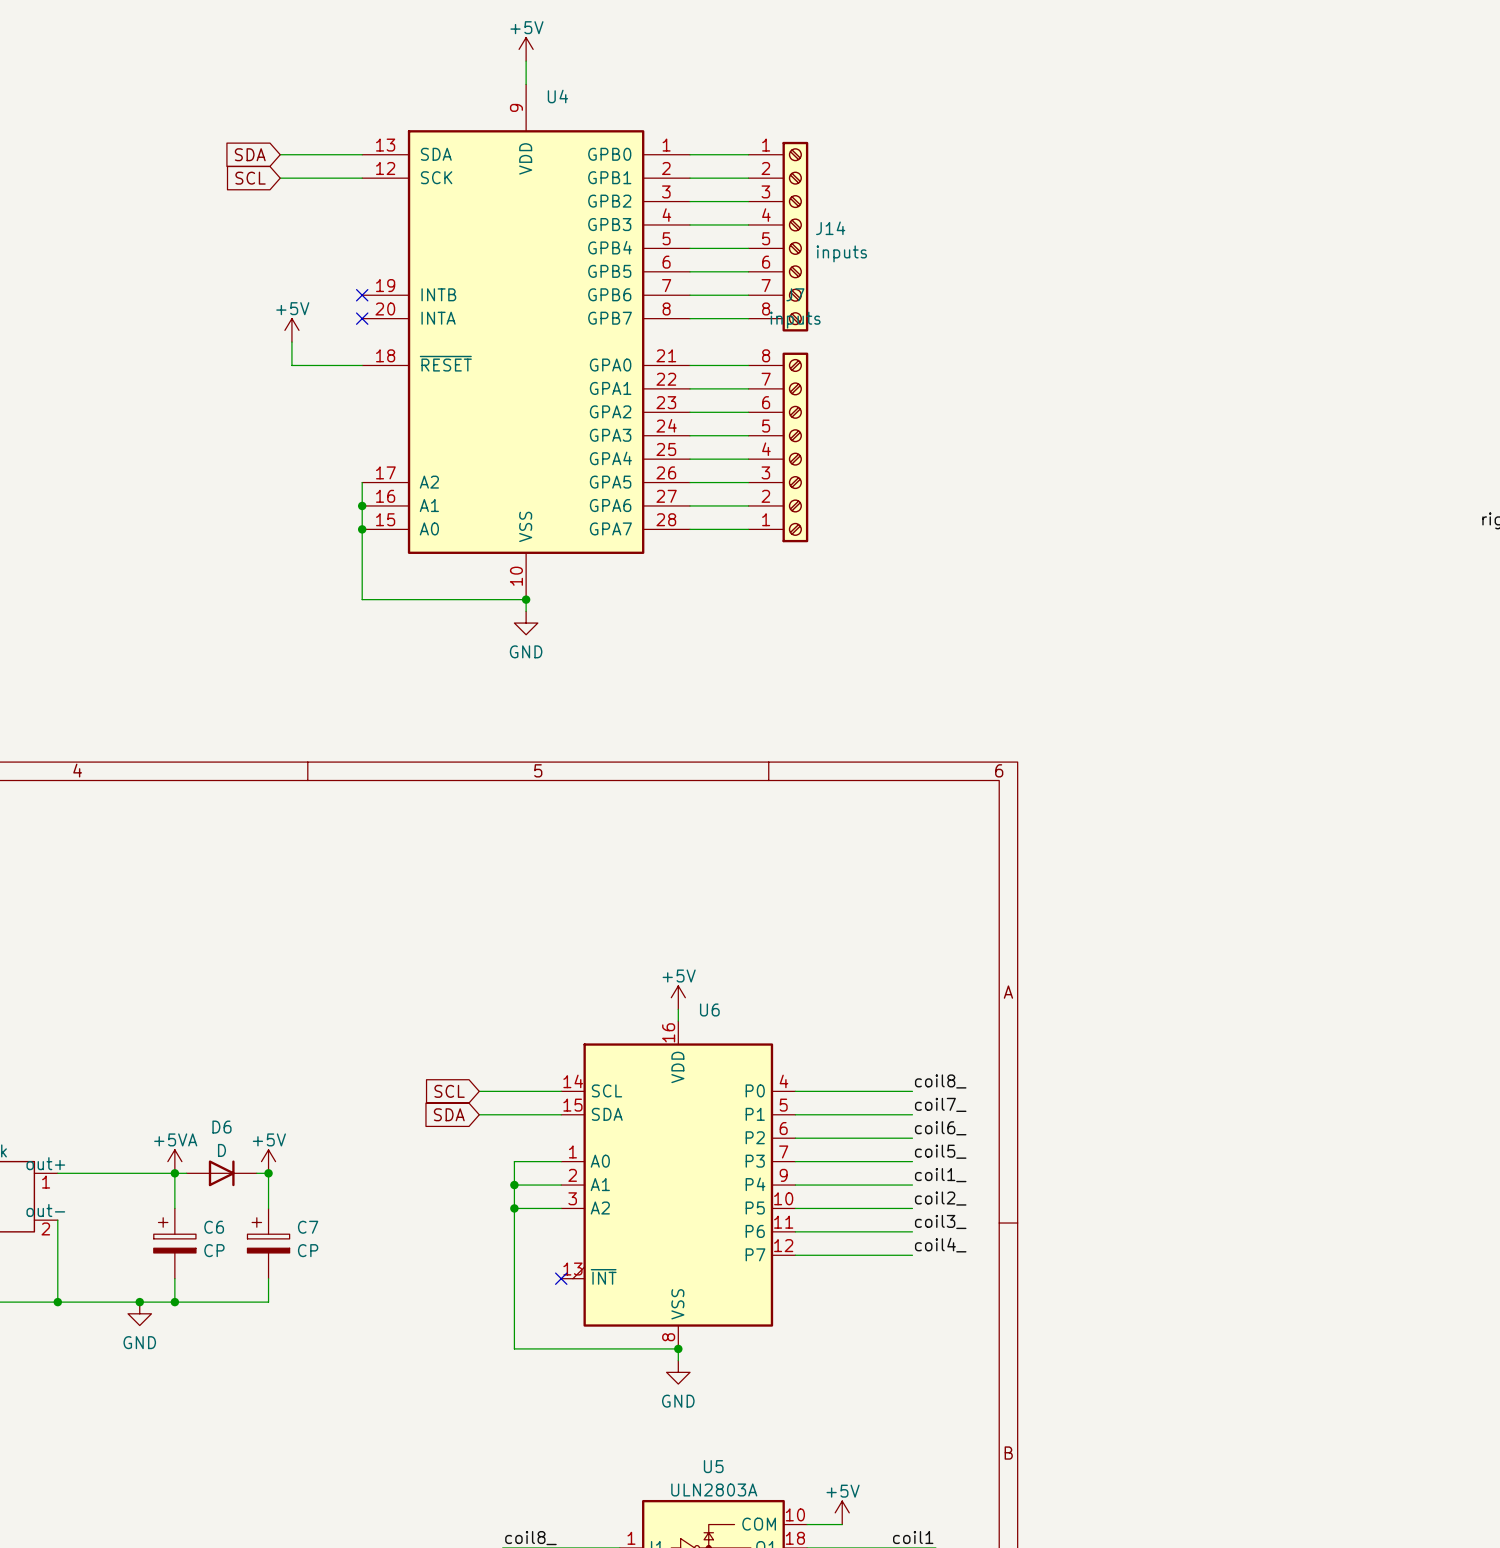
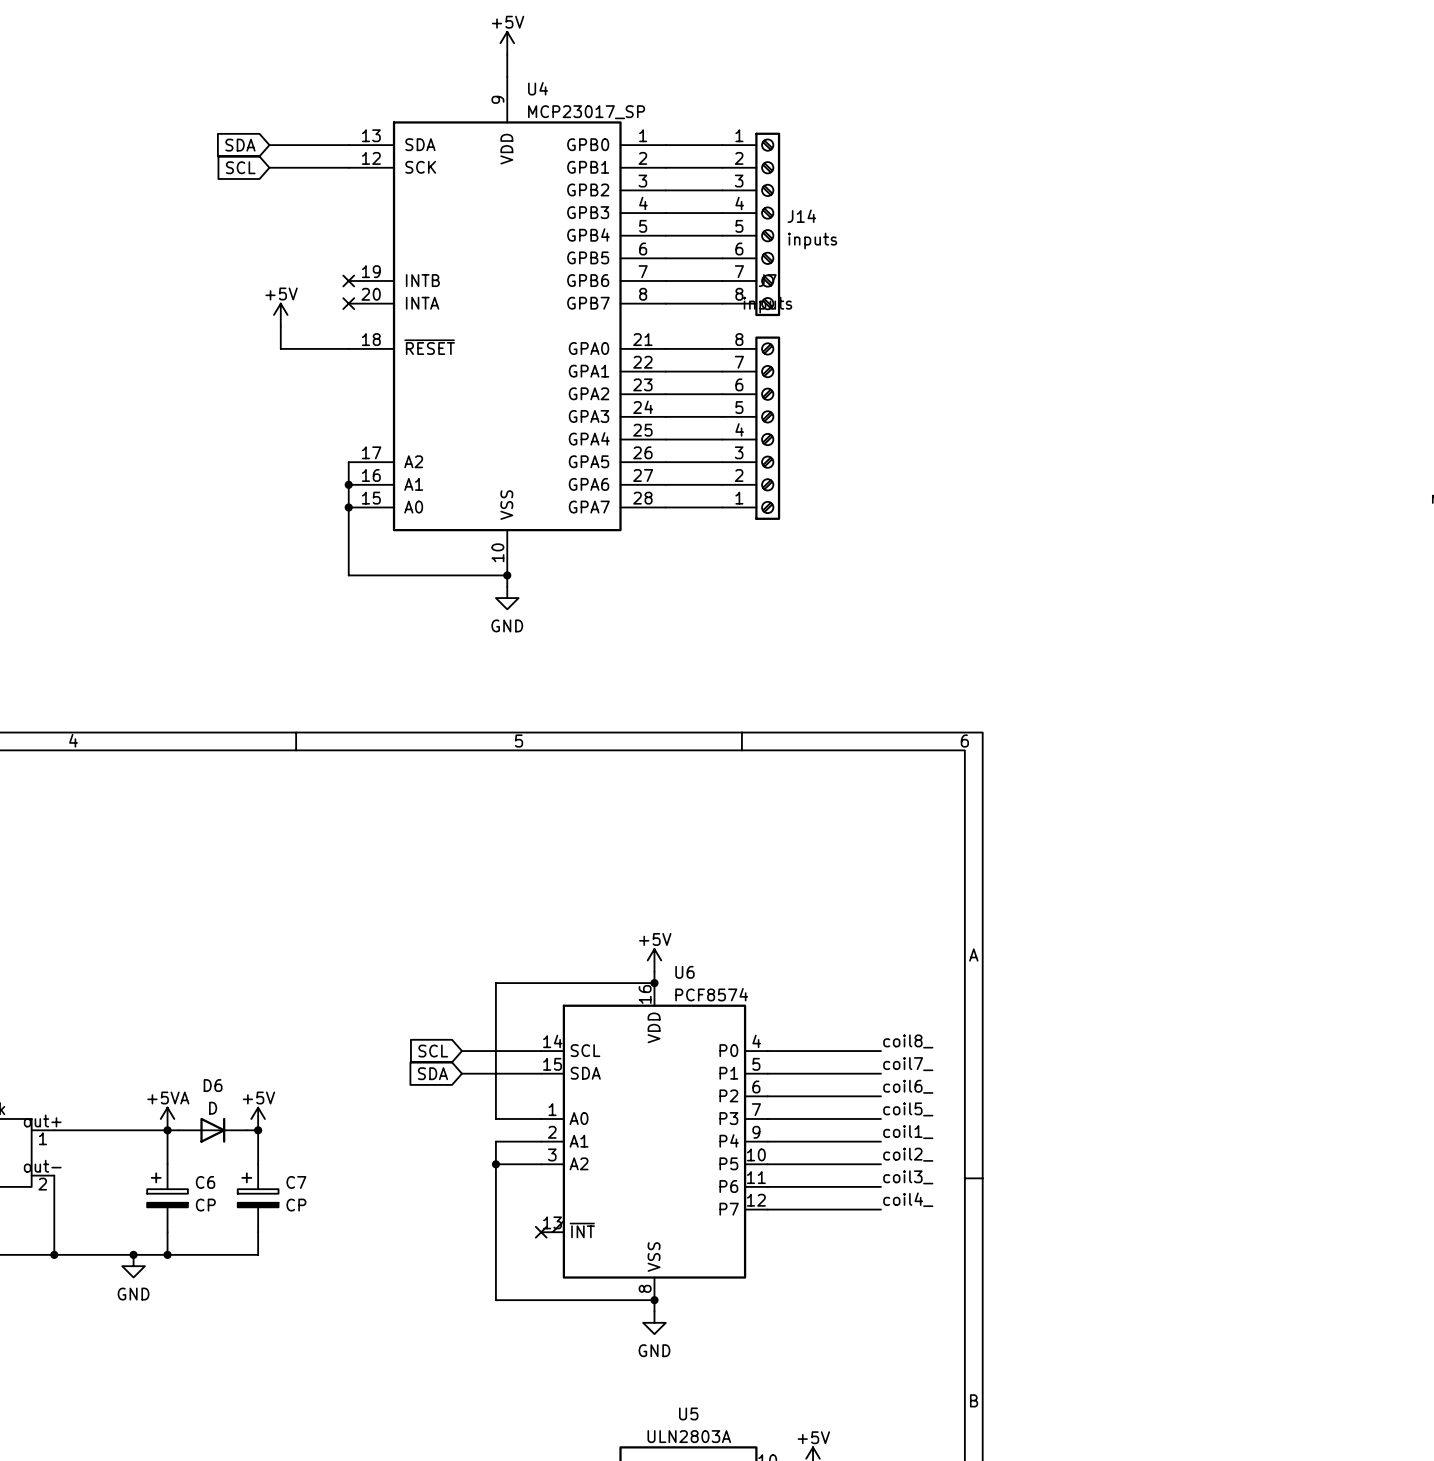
U4 value: none -> MCP23017_SP (586, 112)
junction: none -> (654, 983)
U6 value: none -> PCF8574 (711, 994)
wire: (514, 1161) (514, 1185) -> (495, 1118) (495, 983) (654, 983)
junction: (514, 1185) -> none

